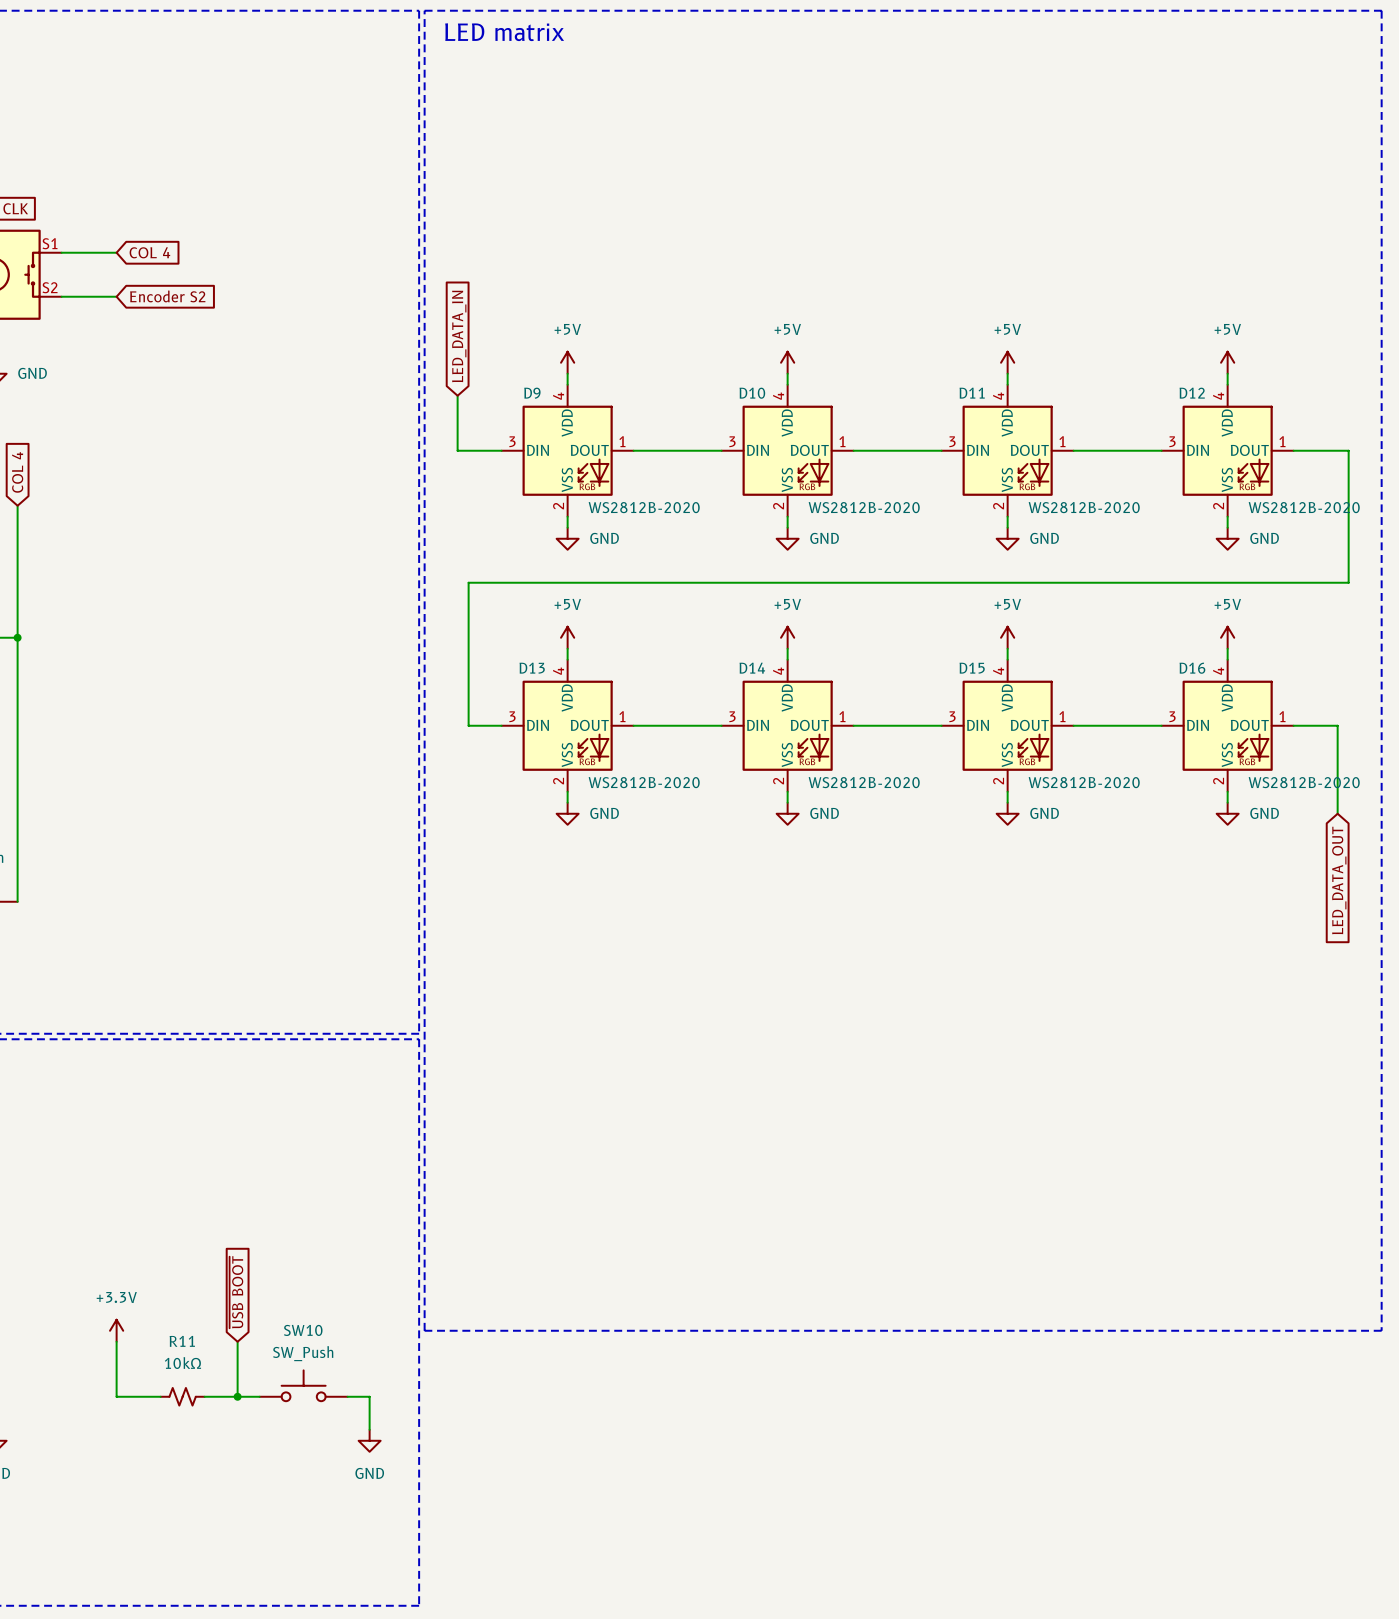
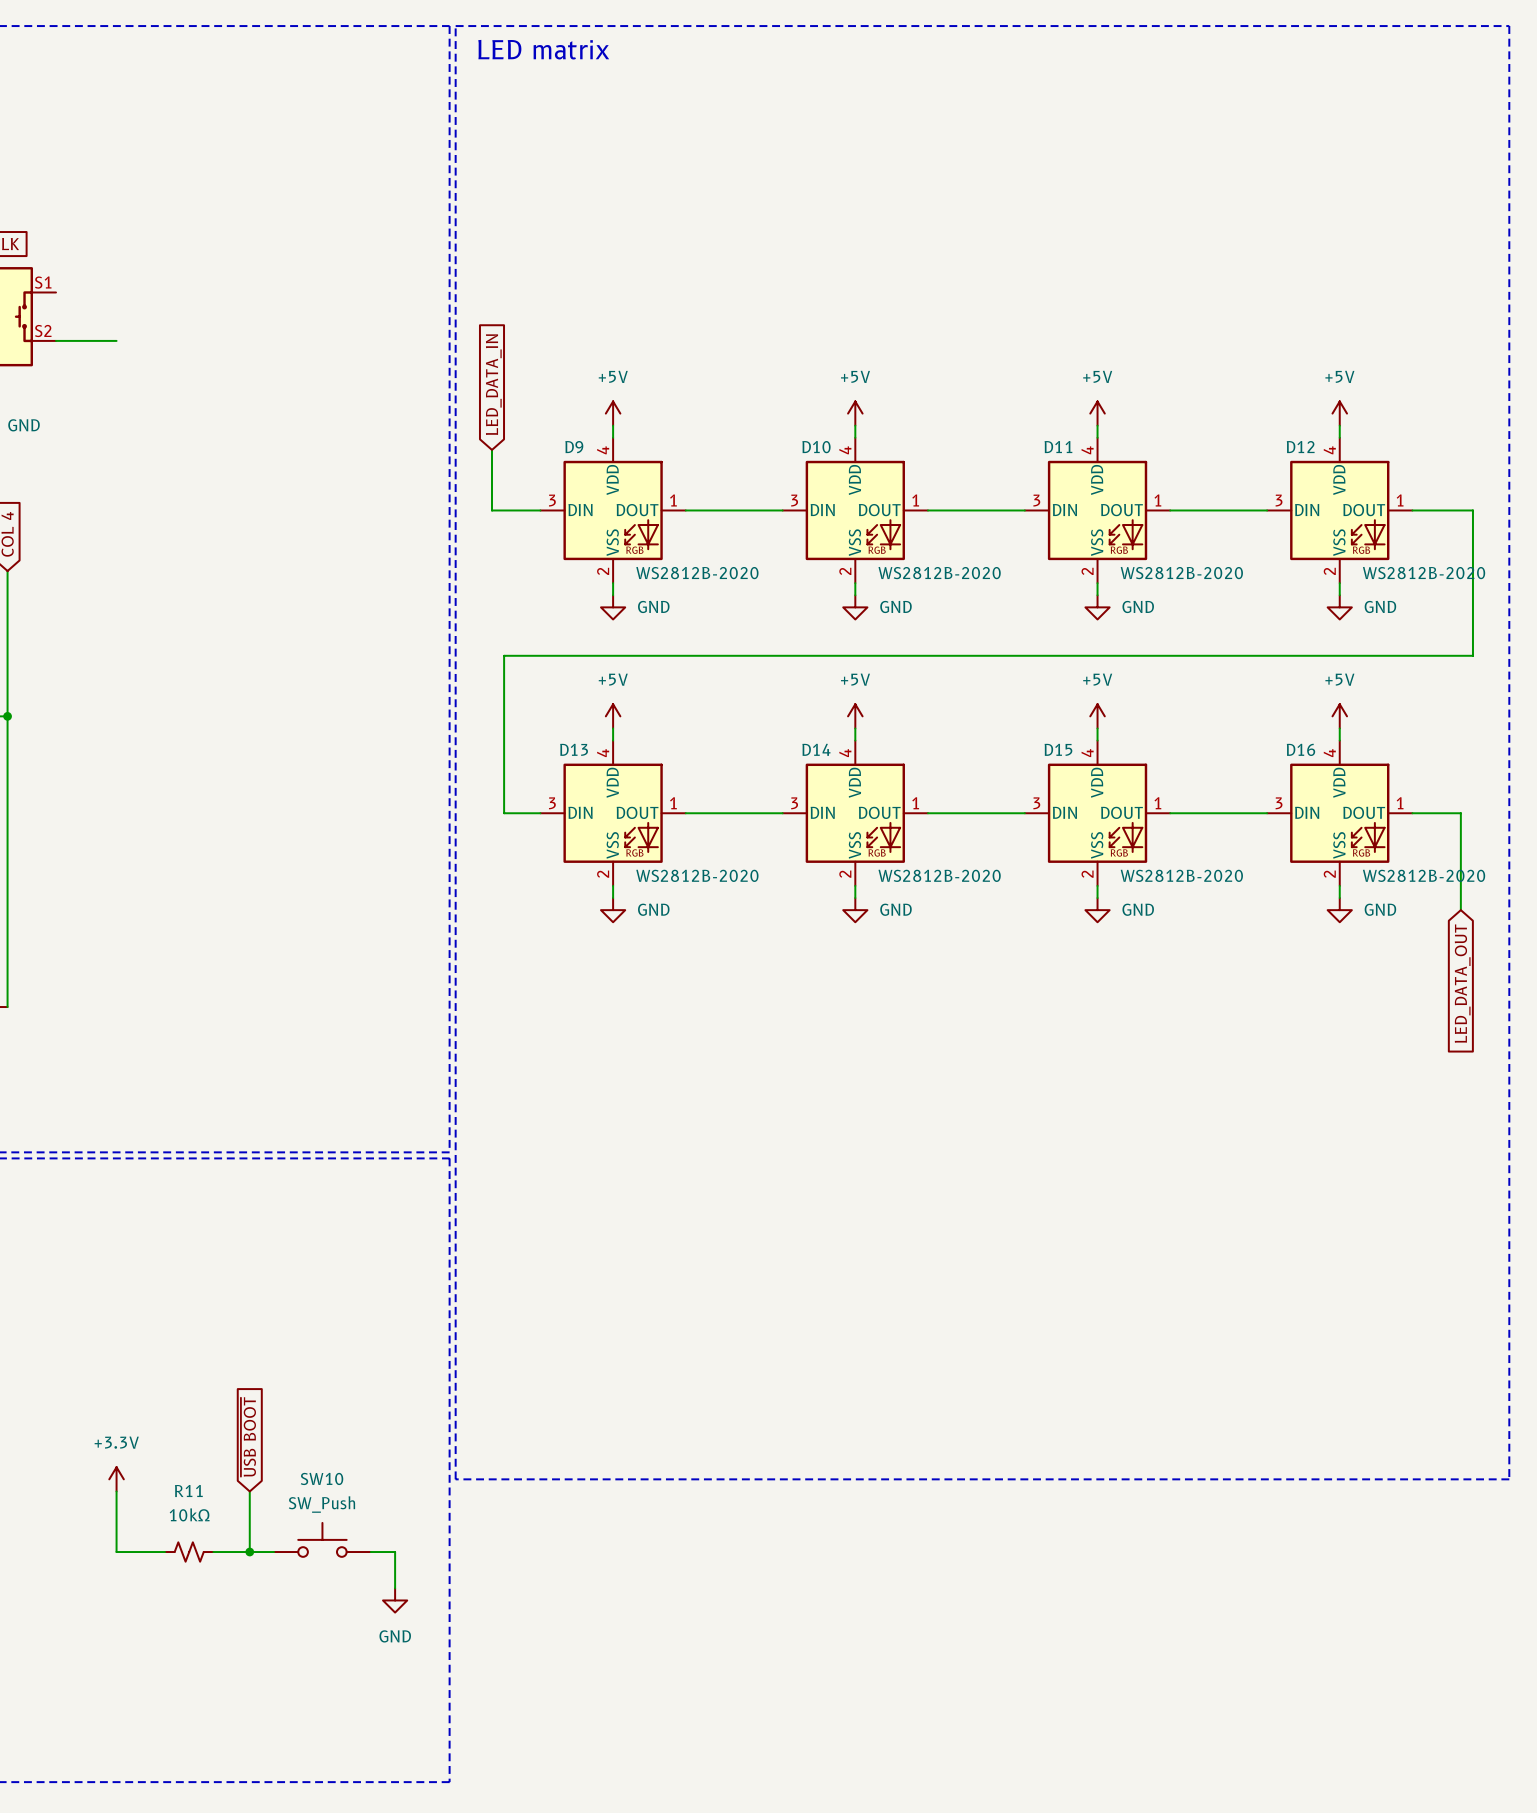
wire: (61, 252) (116, 252) -> none
global label: COL 4 (149, 252) -> none
global label: Encoder S2 (167, 296) -> none

